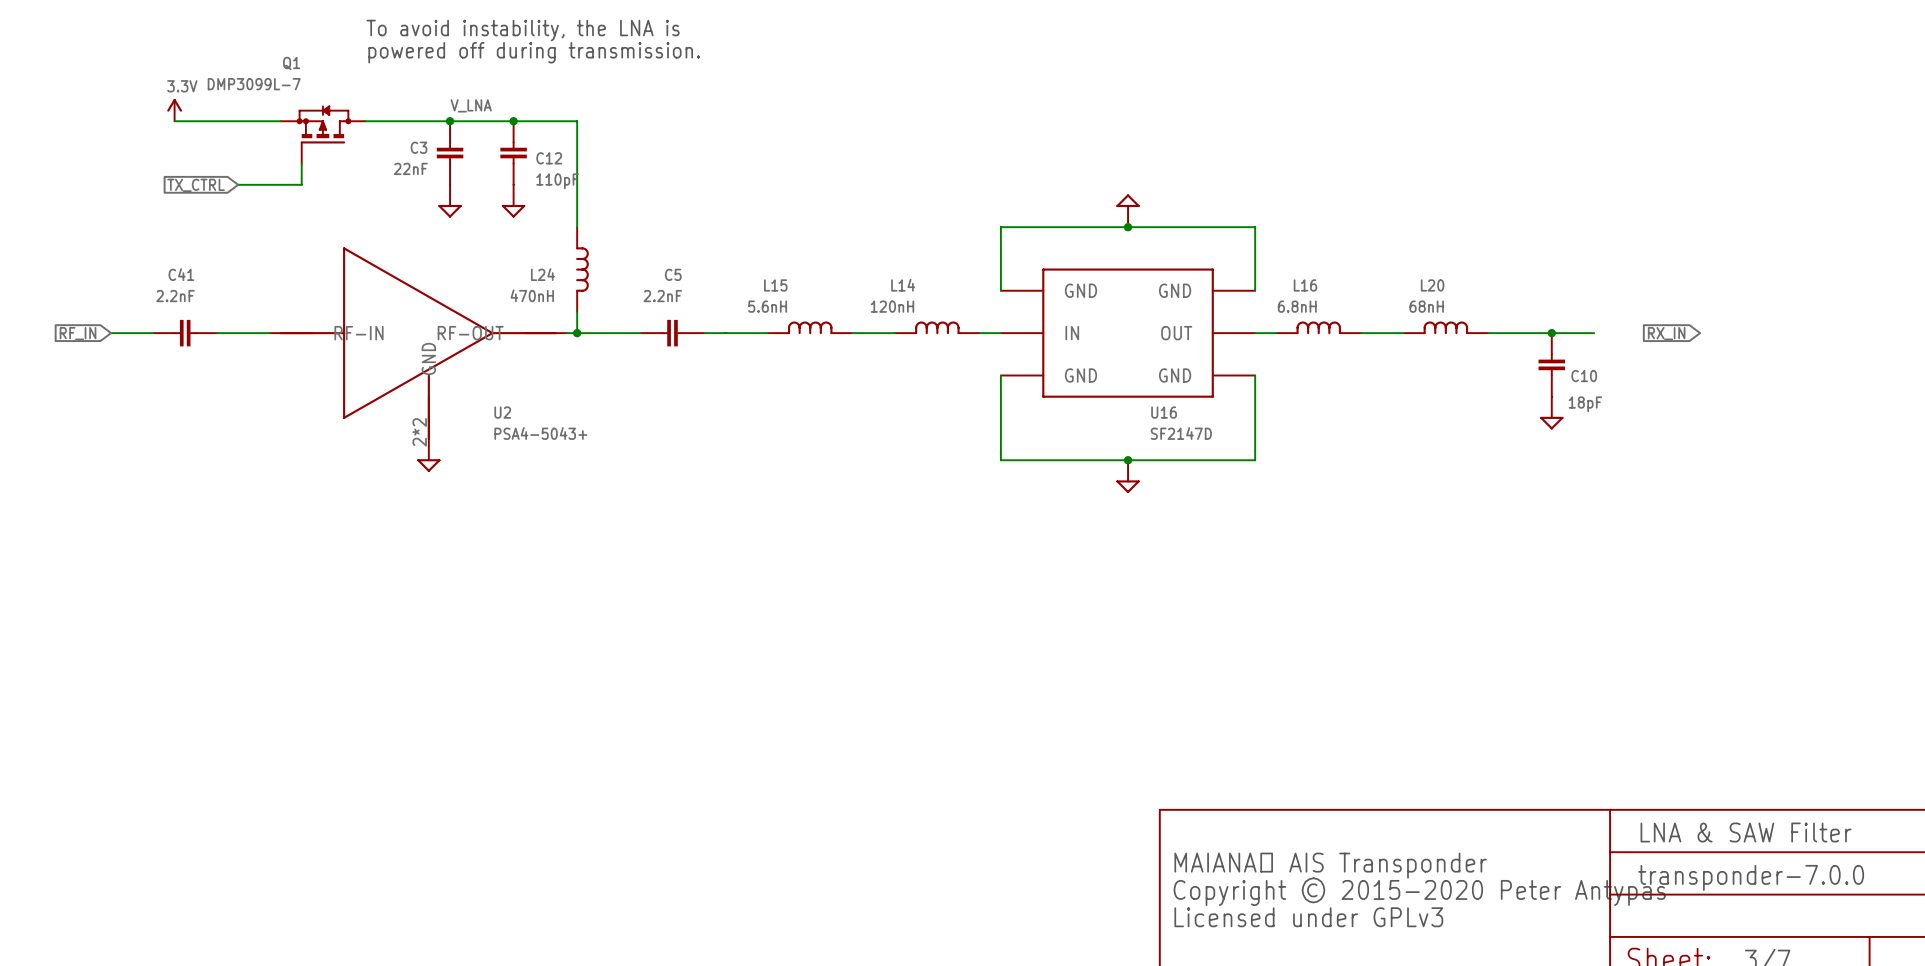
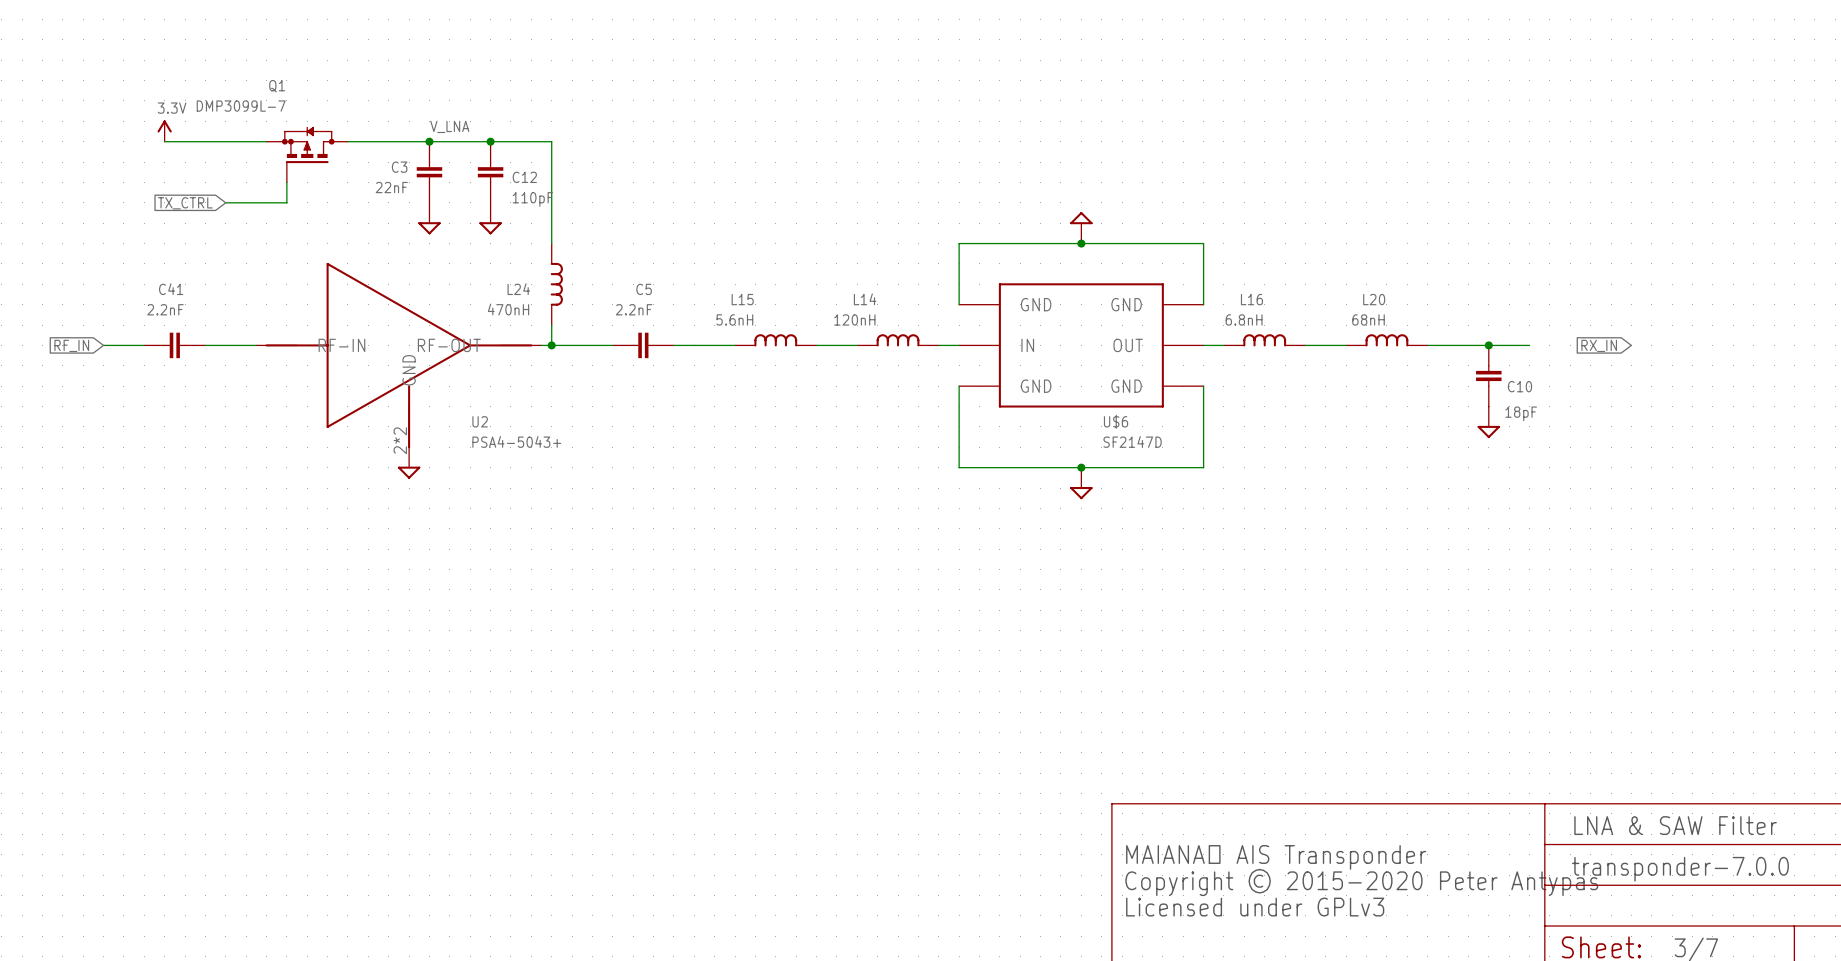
text: To avoid instability, the LNA is (523, 30) -> none
text: powered off during transmission. (534, 52) -> none
U16 name: U16 (1164, 412) -> U$6 (1116, 421)

